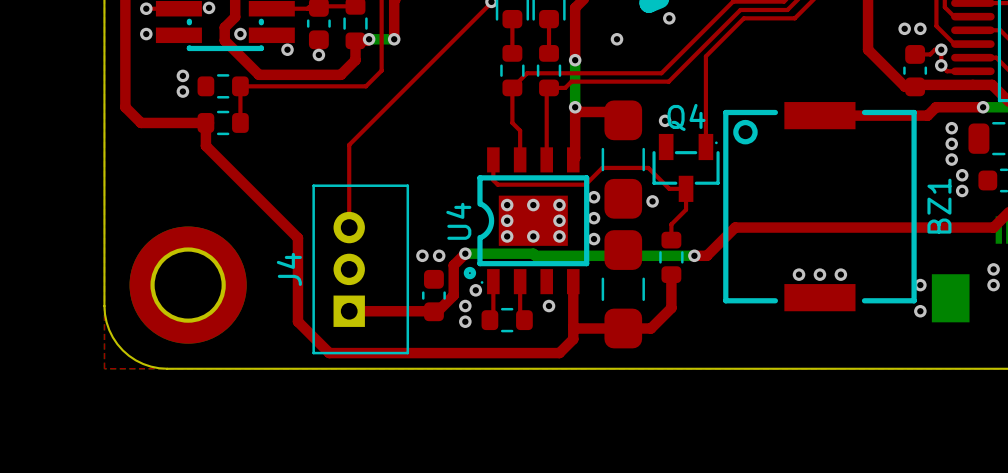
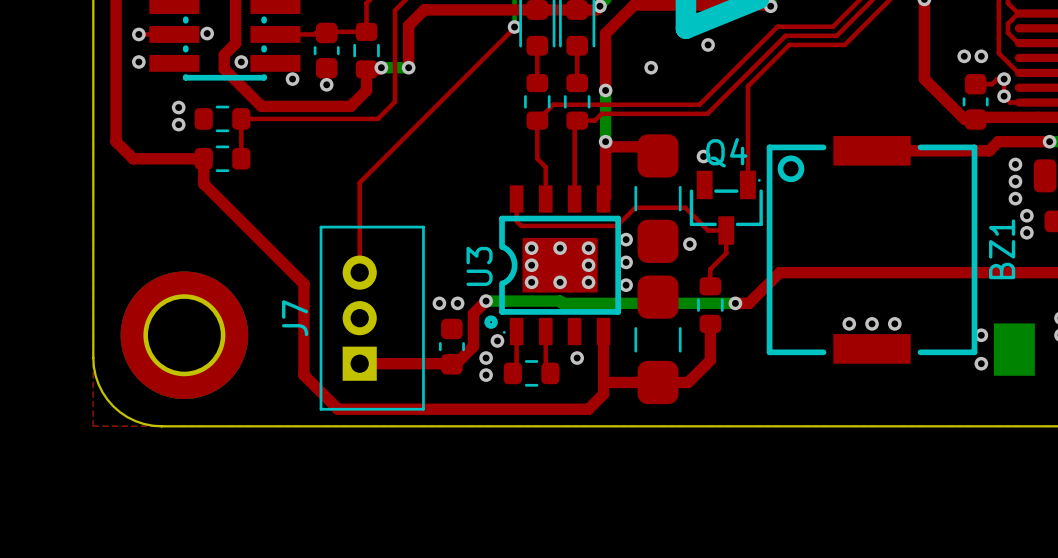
U4 name: U4 (458, 221) -> U3 (479, 266)
J4 name: J4 (289, 269) -> J7 (295, 318)

